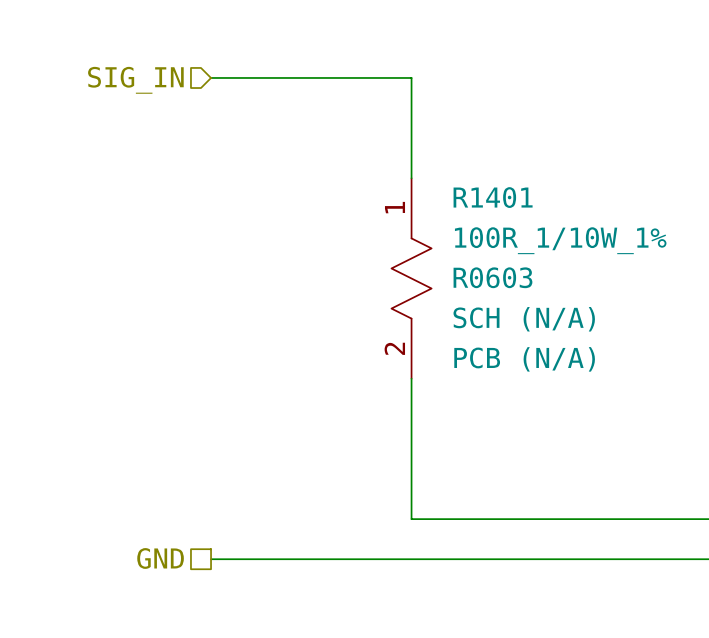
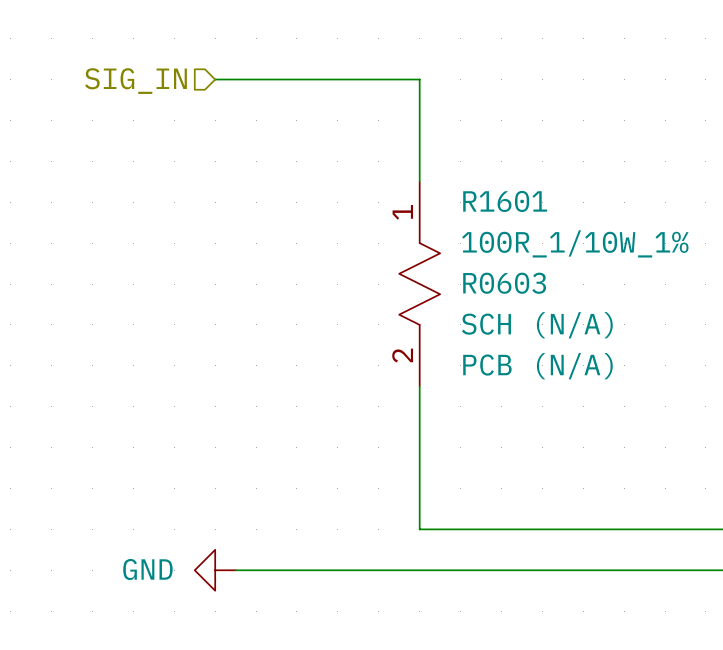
R1401 name: R1401 (493, 197) -> R1601 (505, 201)
hierarchical label: GND (160, 558) -> none
power symbol: none -> GND (215, 570)

